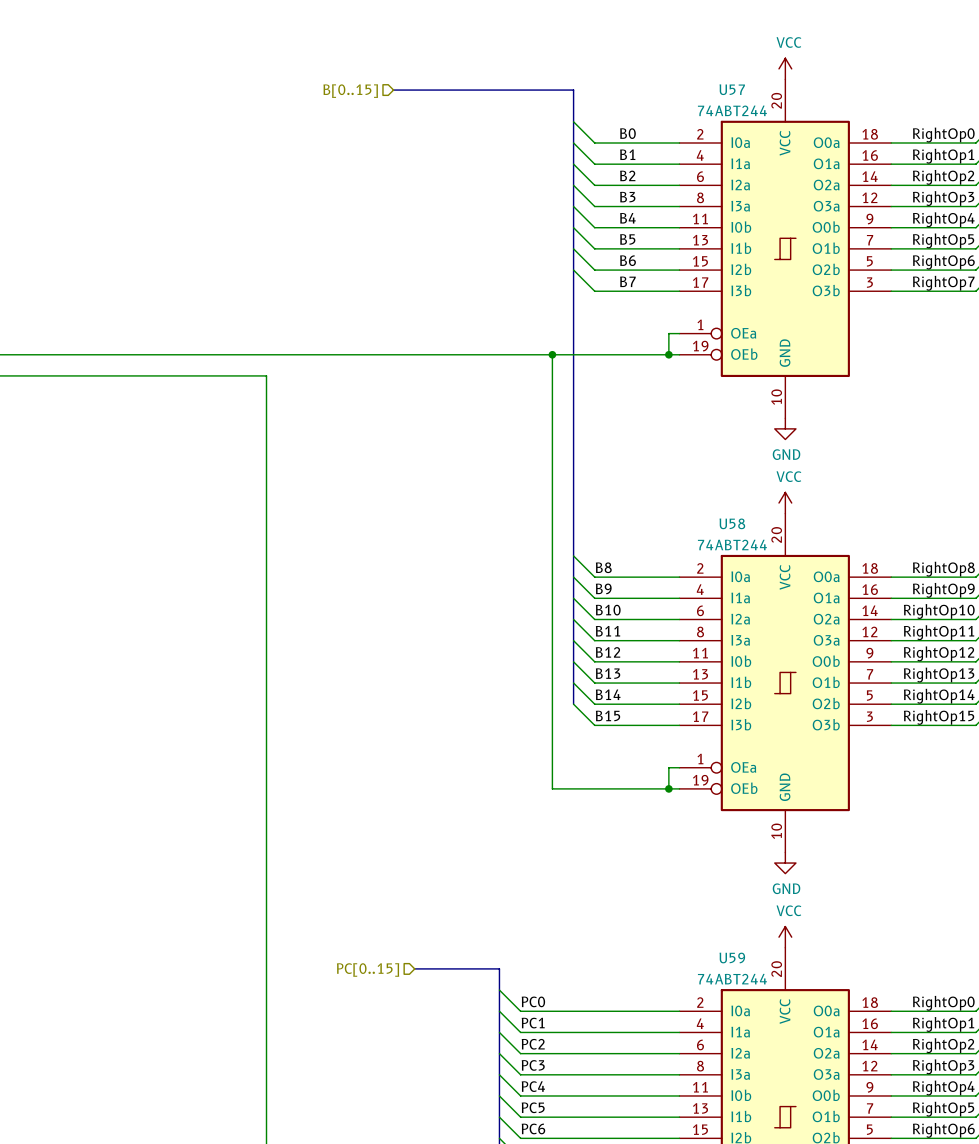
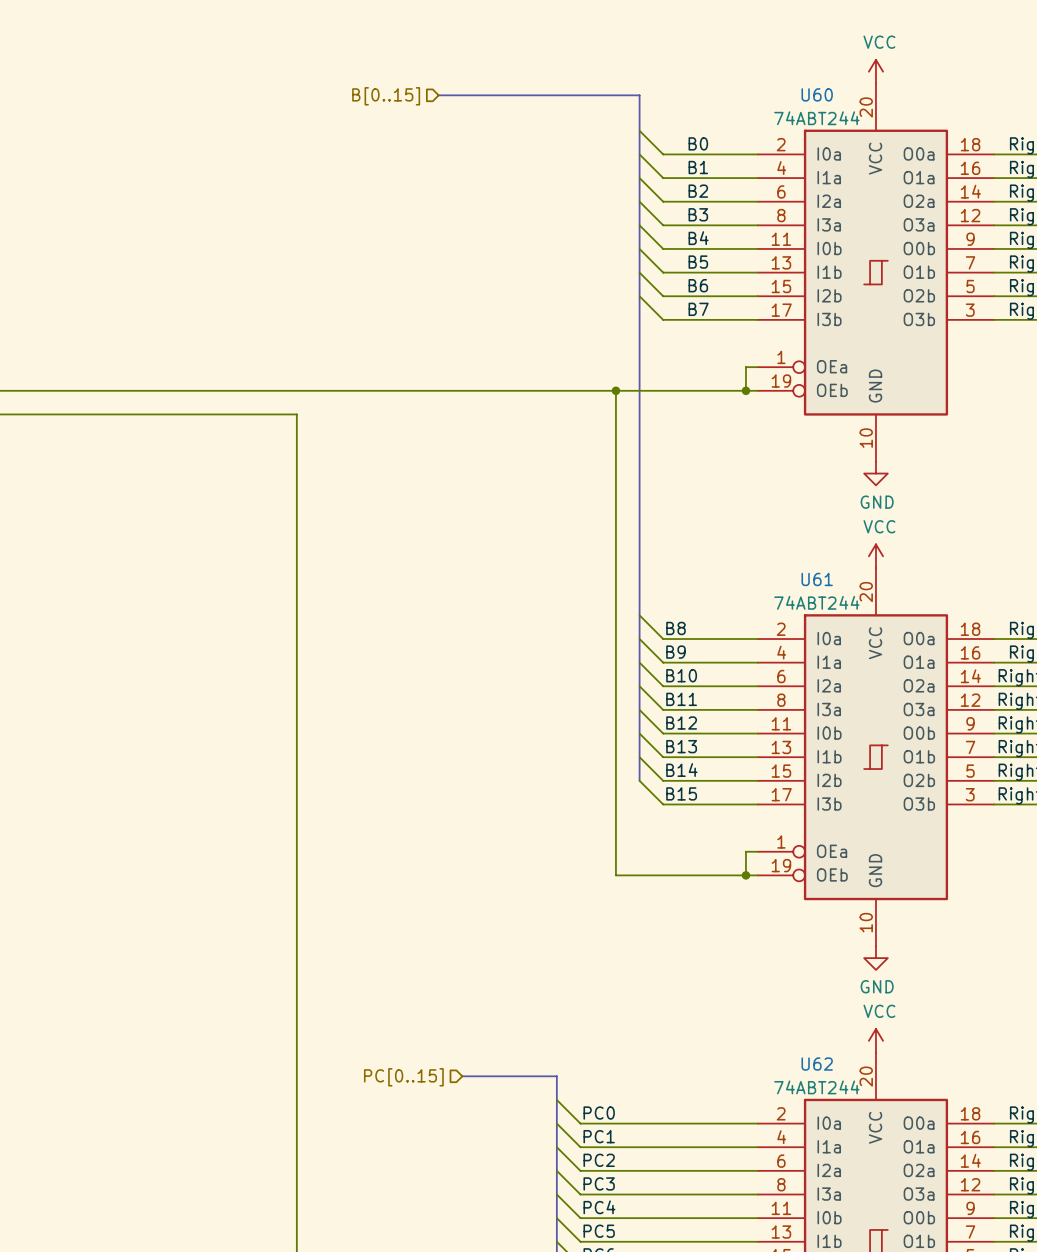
U57 name: U57 (732, 89) -> U60 (817, 94)
U58 name: U58 (732, 523) -> U61 (817, 579)
U59 name: U59 (732, 958) -> U62 (817, 1064)

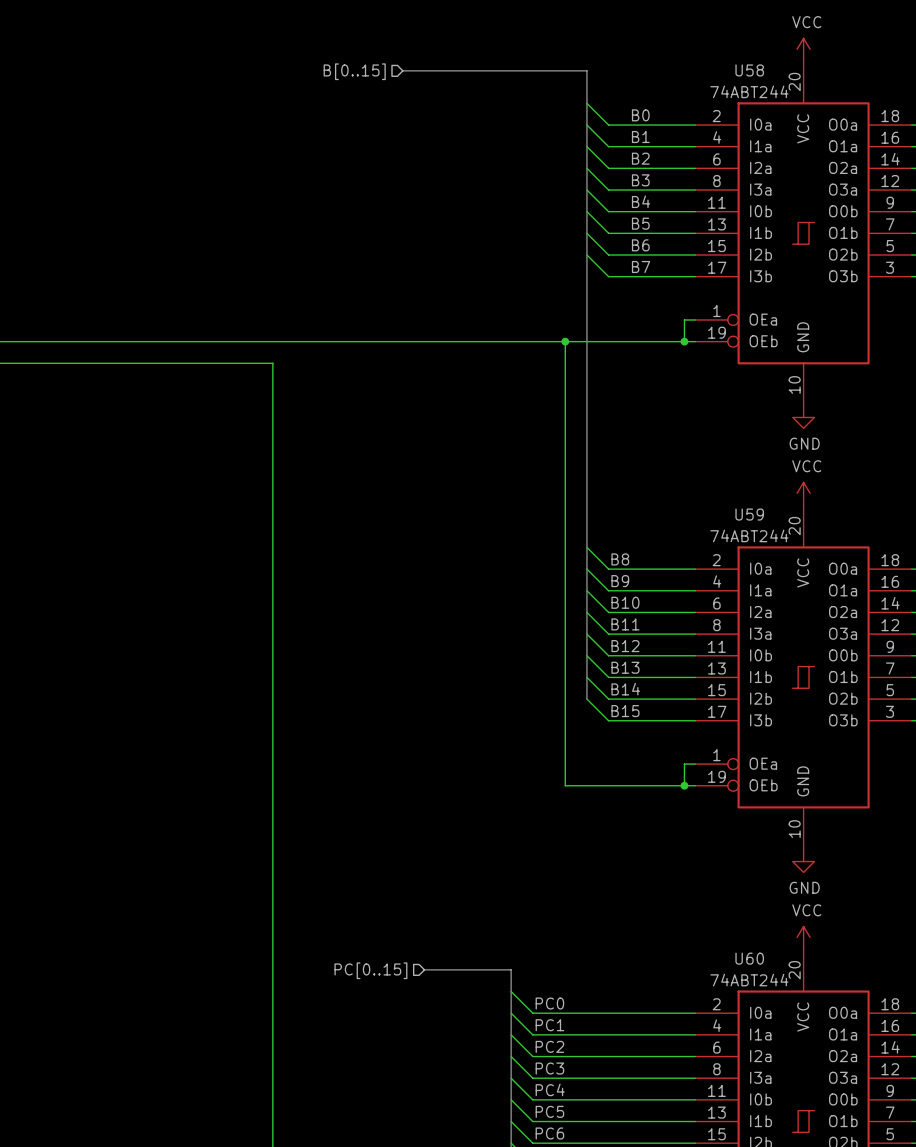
U60 name: U60 (817, 94) -> U58 (749, 70)
U61 name: U61 (817, 579) -> U59 (749, 514)
U62 name: U62 (817, 1064) -> U60 (749, 958)

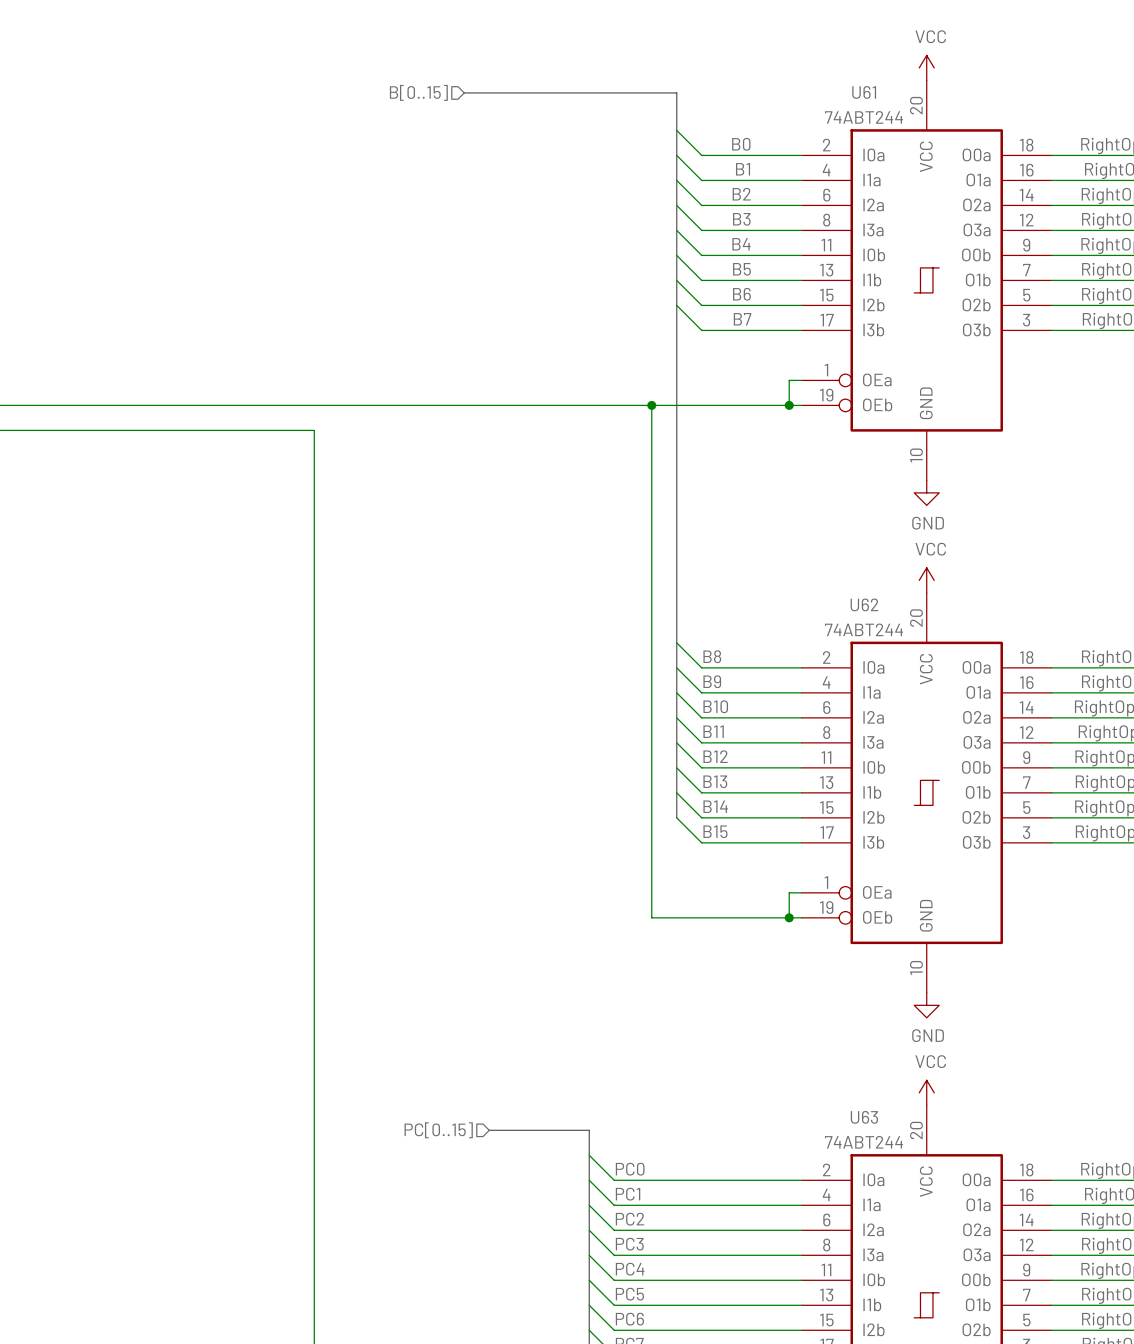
U58 name: U58 (749, 70) -> U61 (864, 92)
U59 name: U59 (749, 514) -> U62 (864, 604)
U60 name: U60 (749, 958) -> U63 (864, 1117)

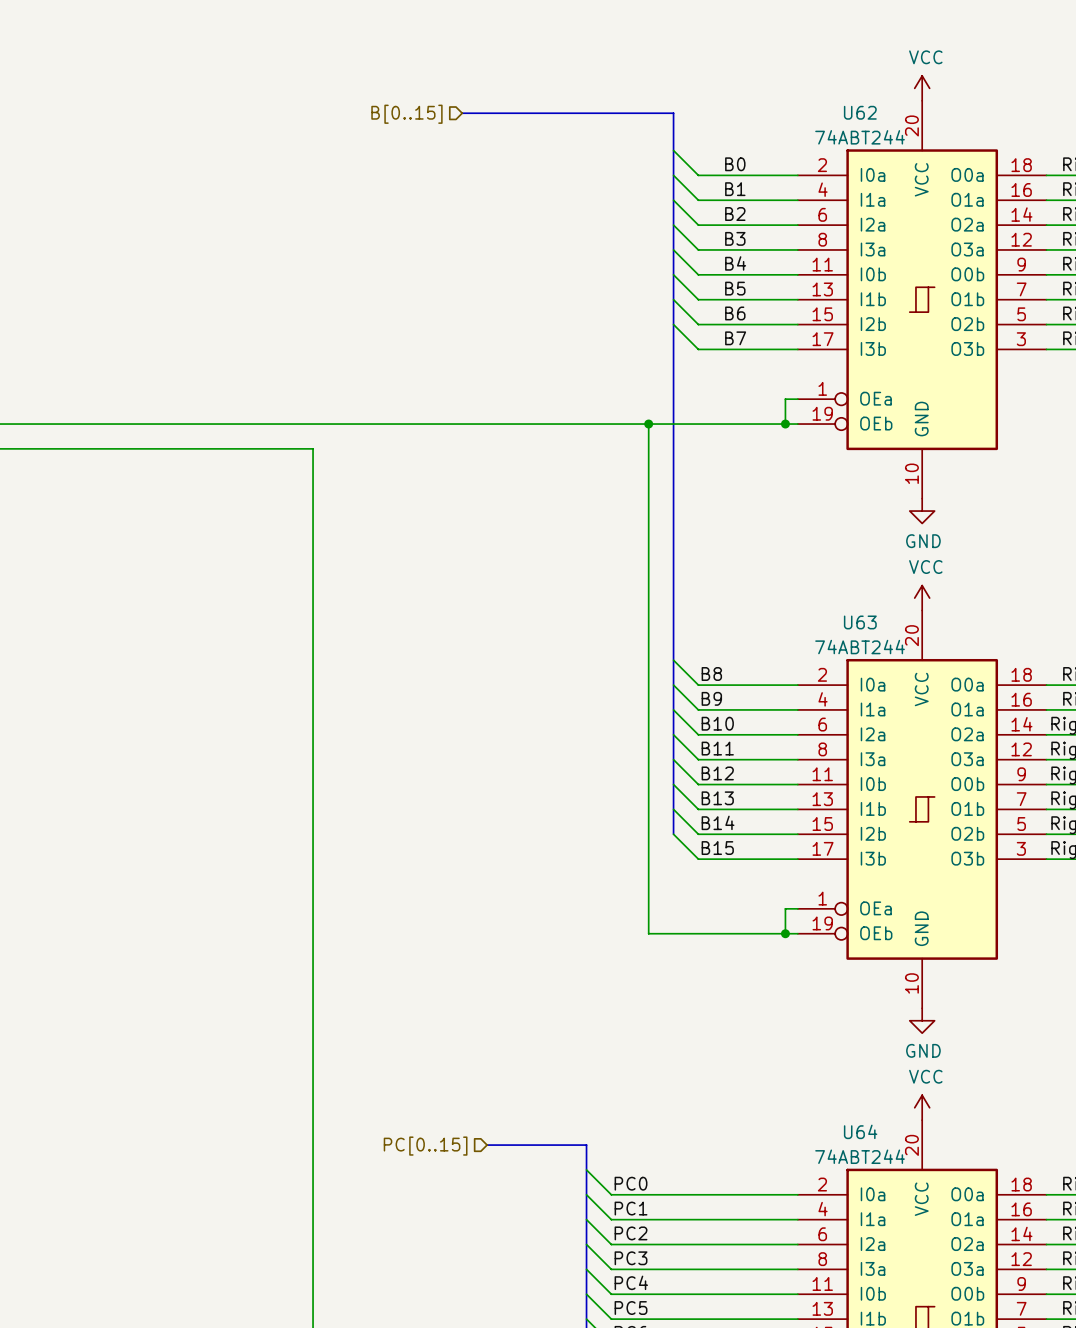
U61 name: U61 (864, 92) -> U62 (860, 112)
U62 name: U62 (864, 604) -> U63 (860, 622)
U63 name: U63 (864, 1117) -> U64 (860, 1131)

